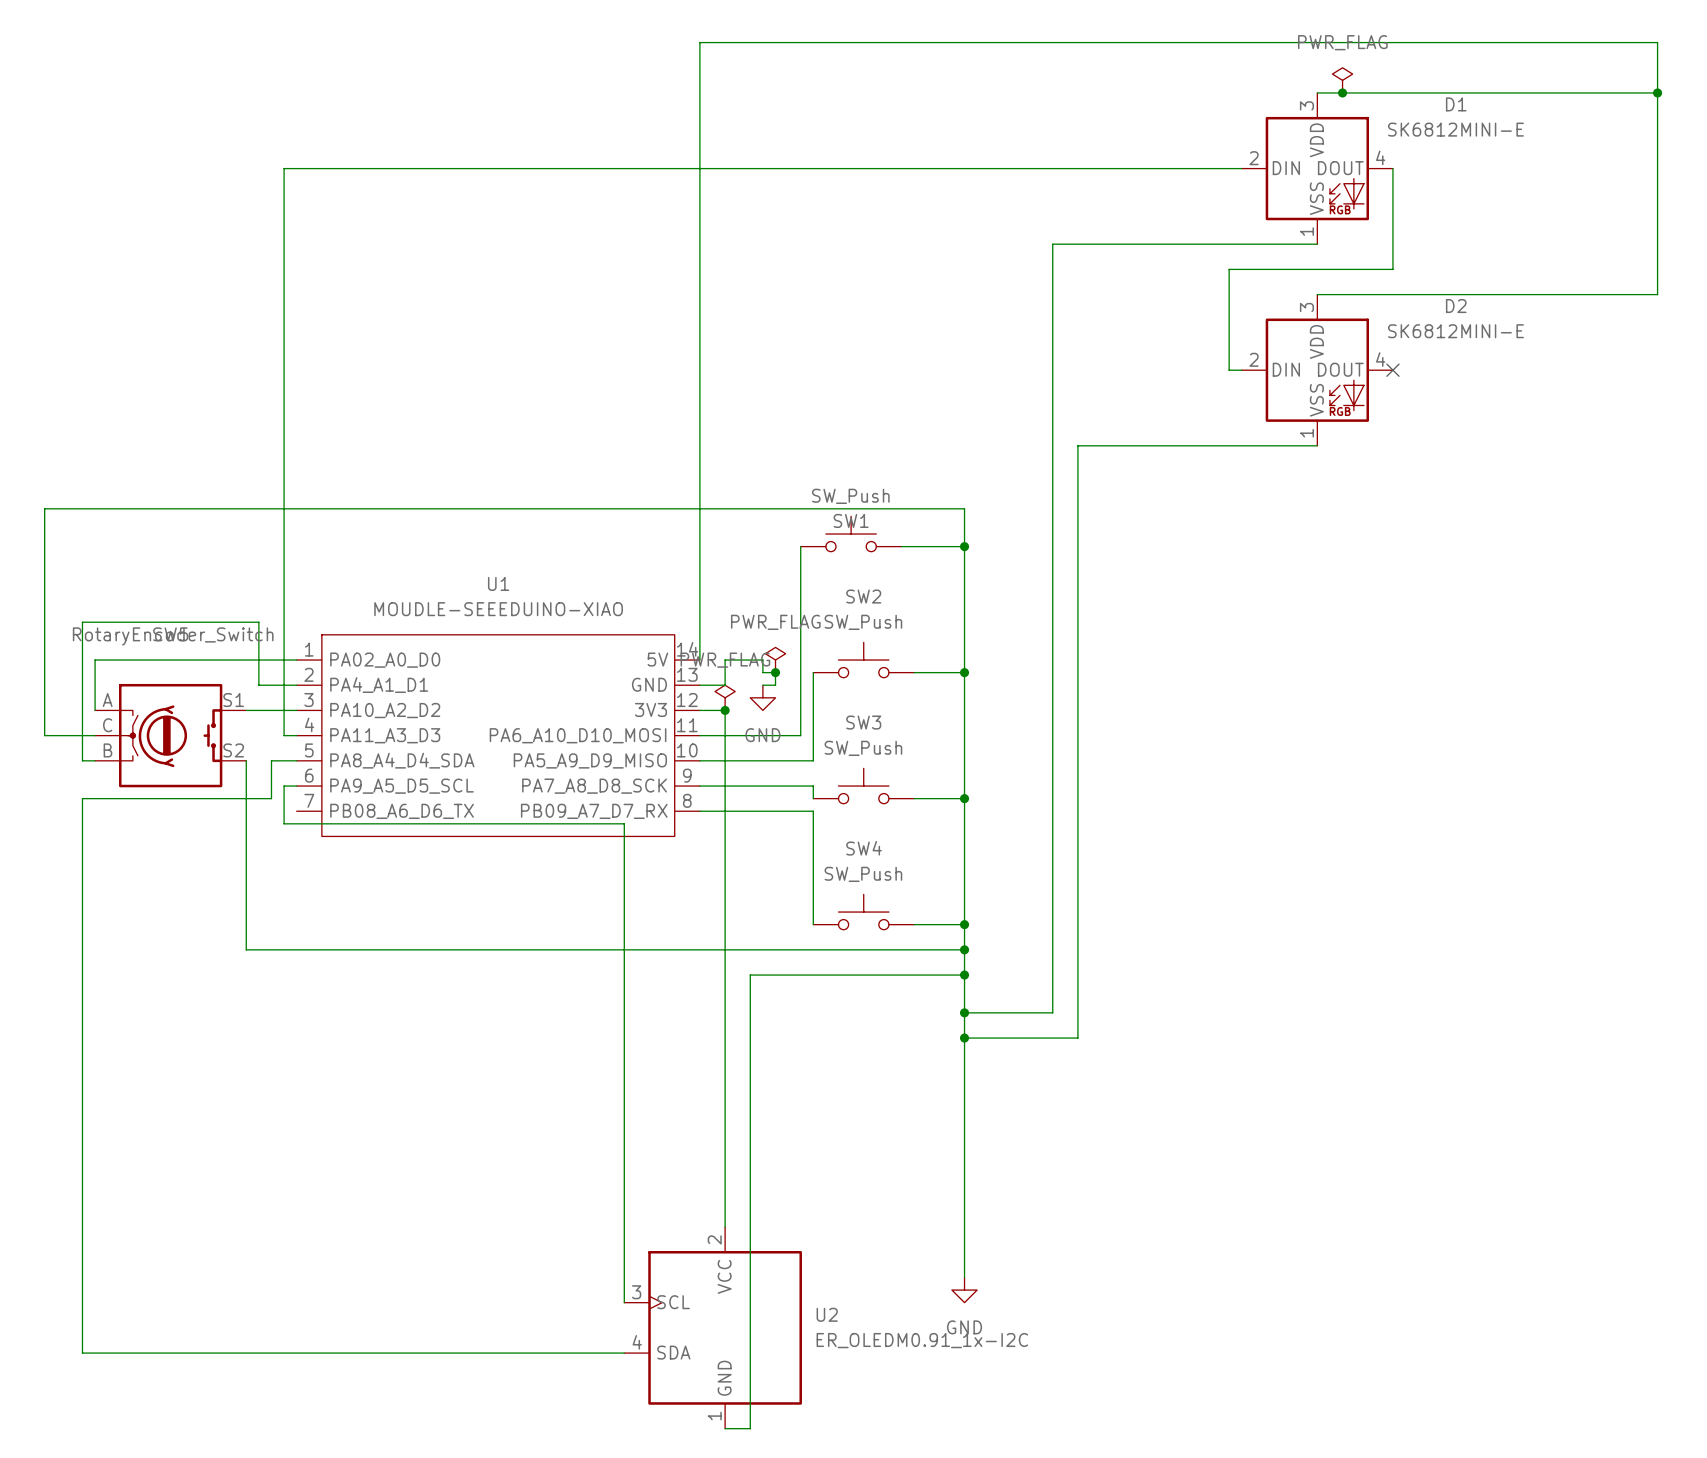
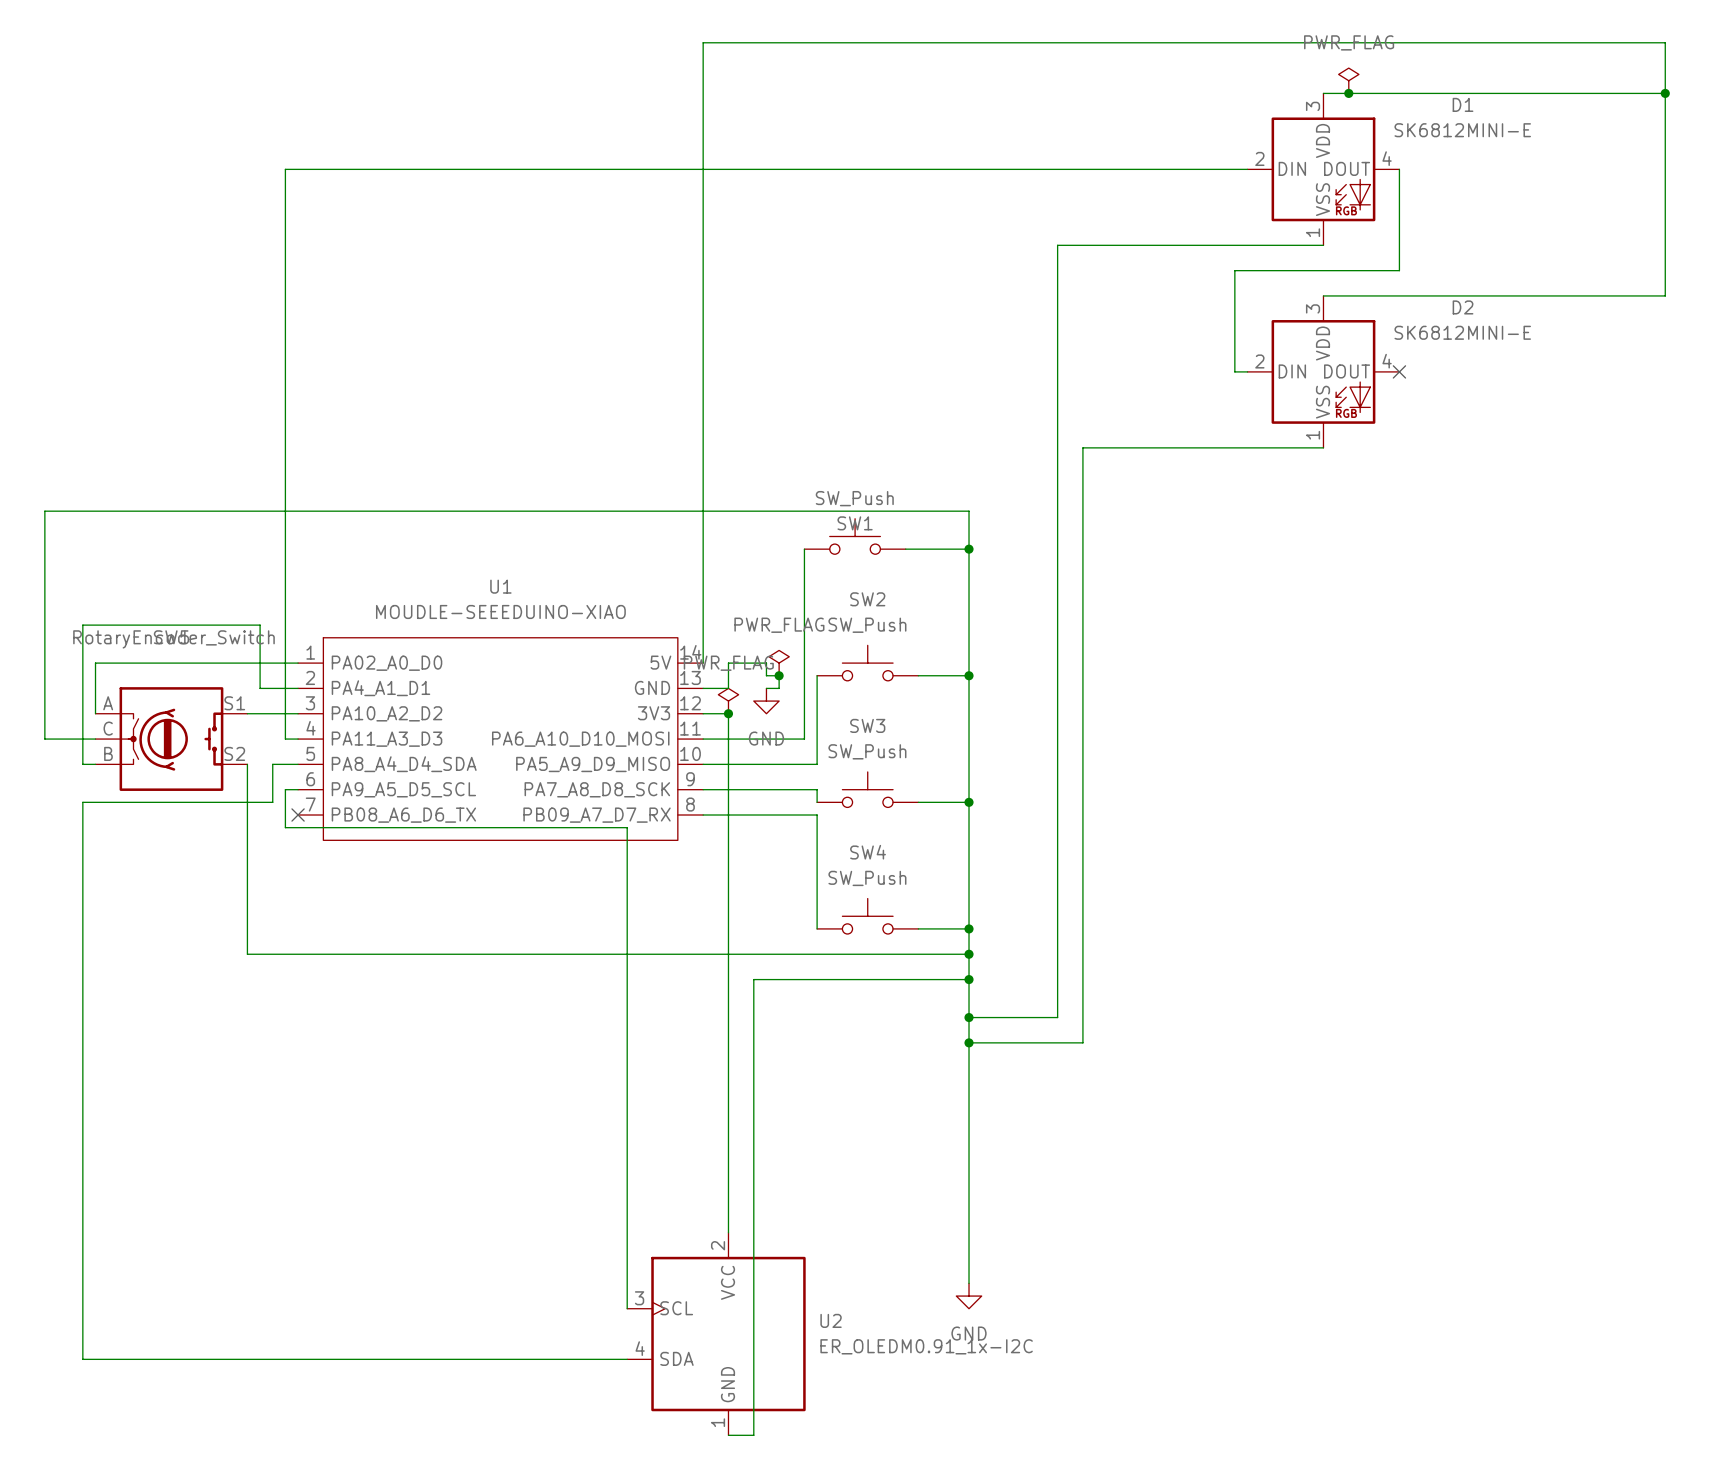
no-connect mark: none -> (298, 815)

